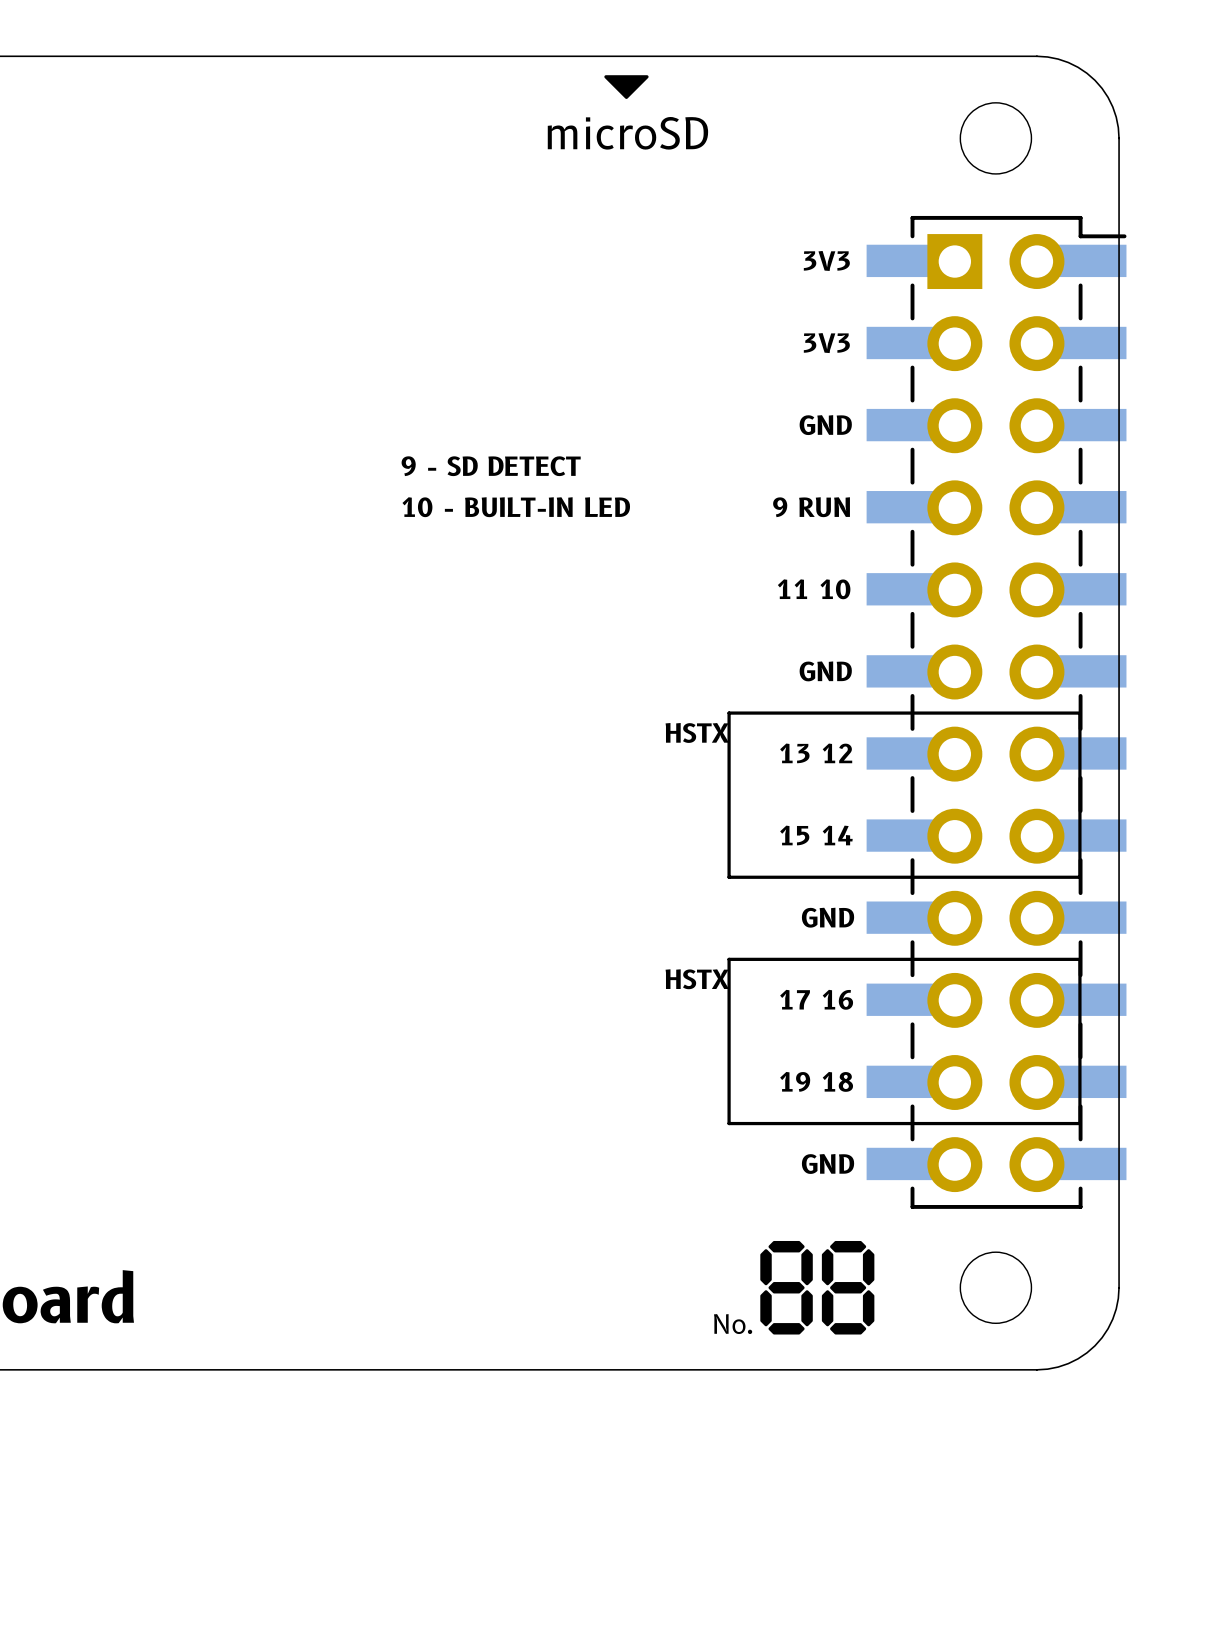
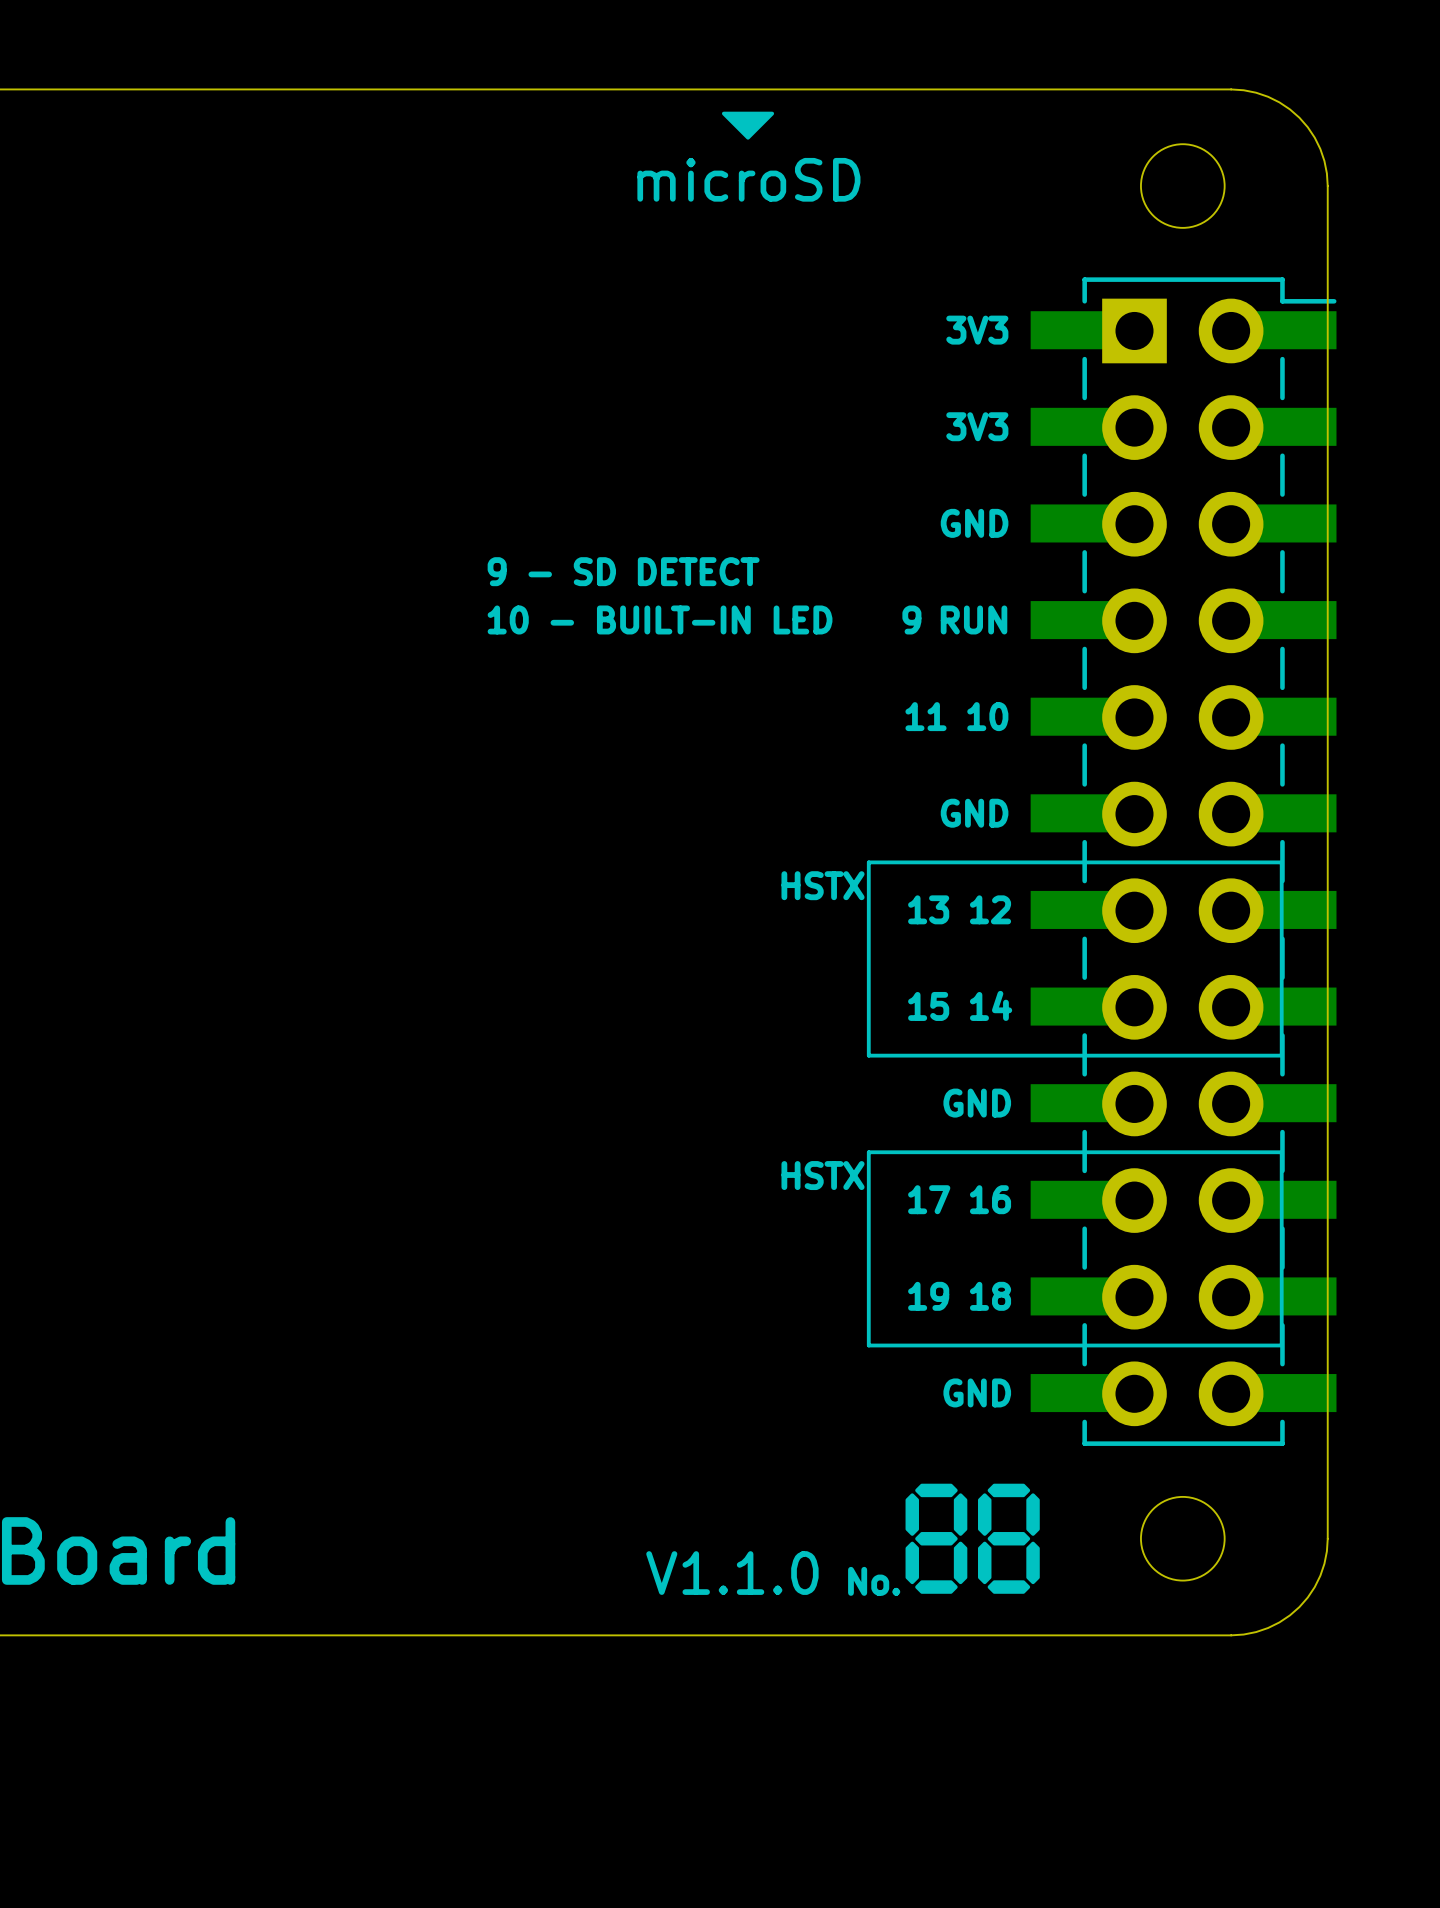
text: none -> 9 (911, 619)
text: 9 RUN (811, 507) -> RUN (974, 619)
text: none -> V1.1.0 (732, 1573)

